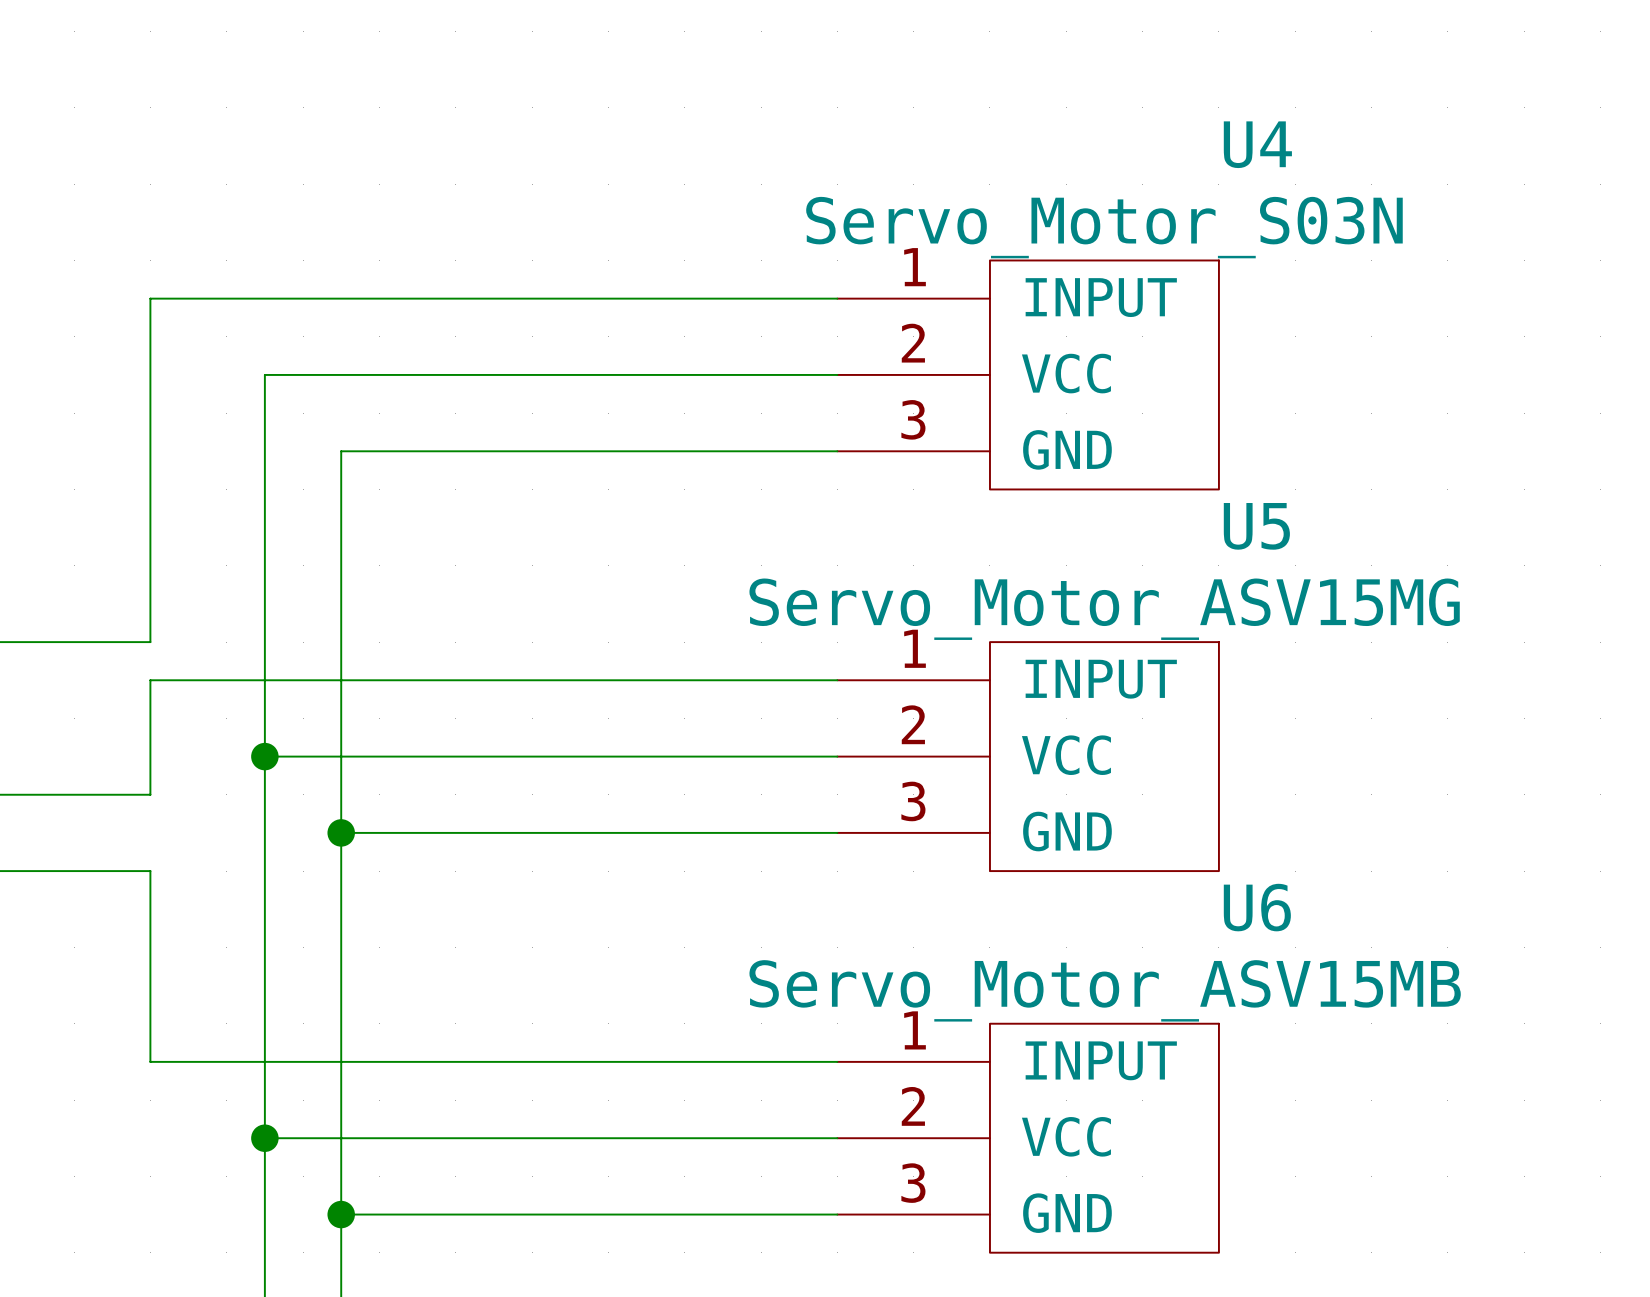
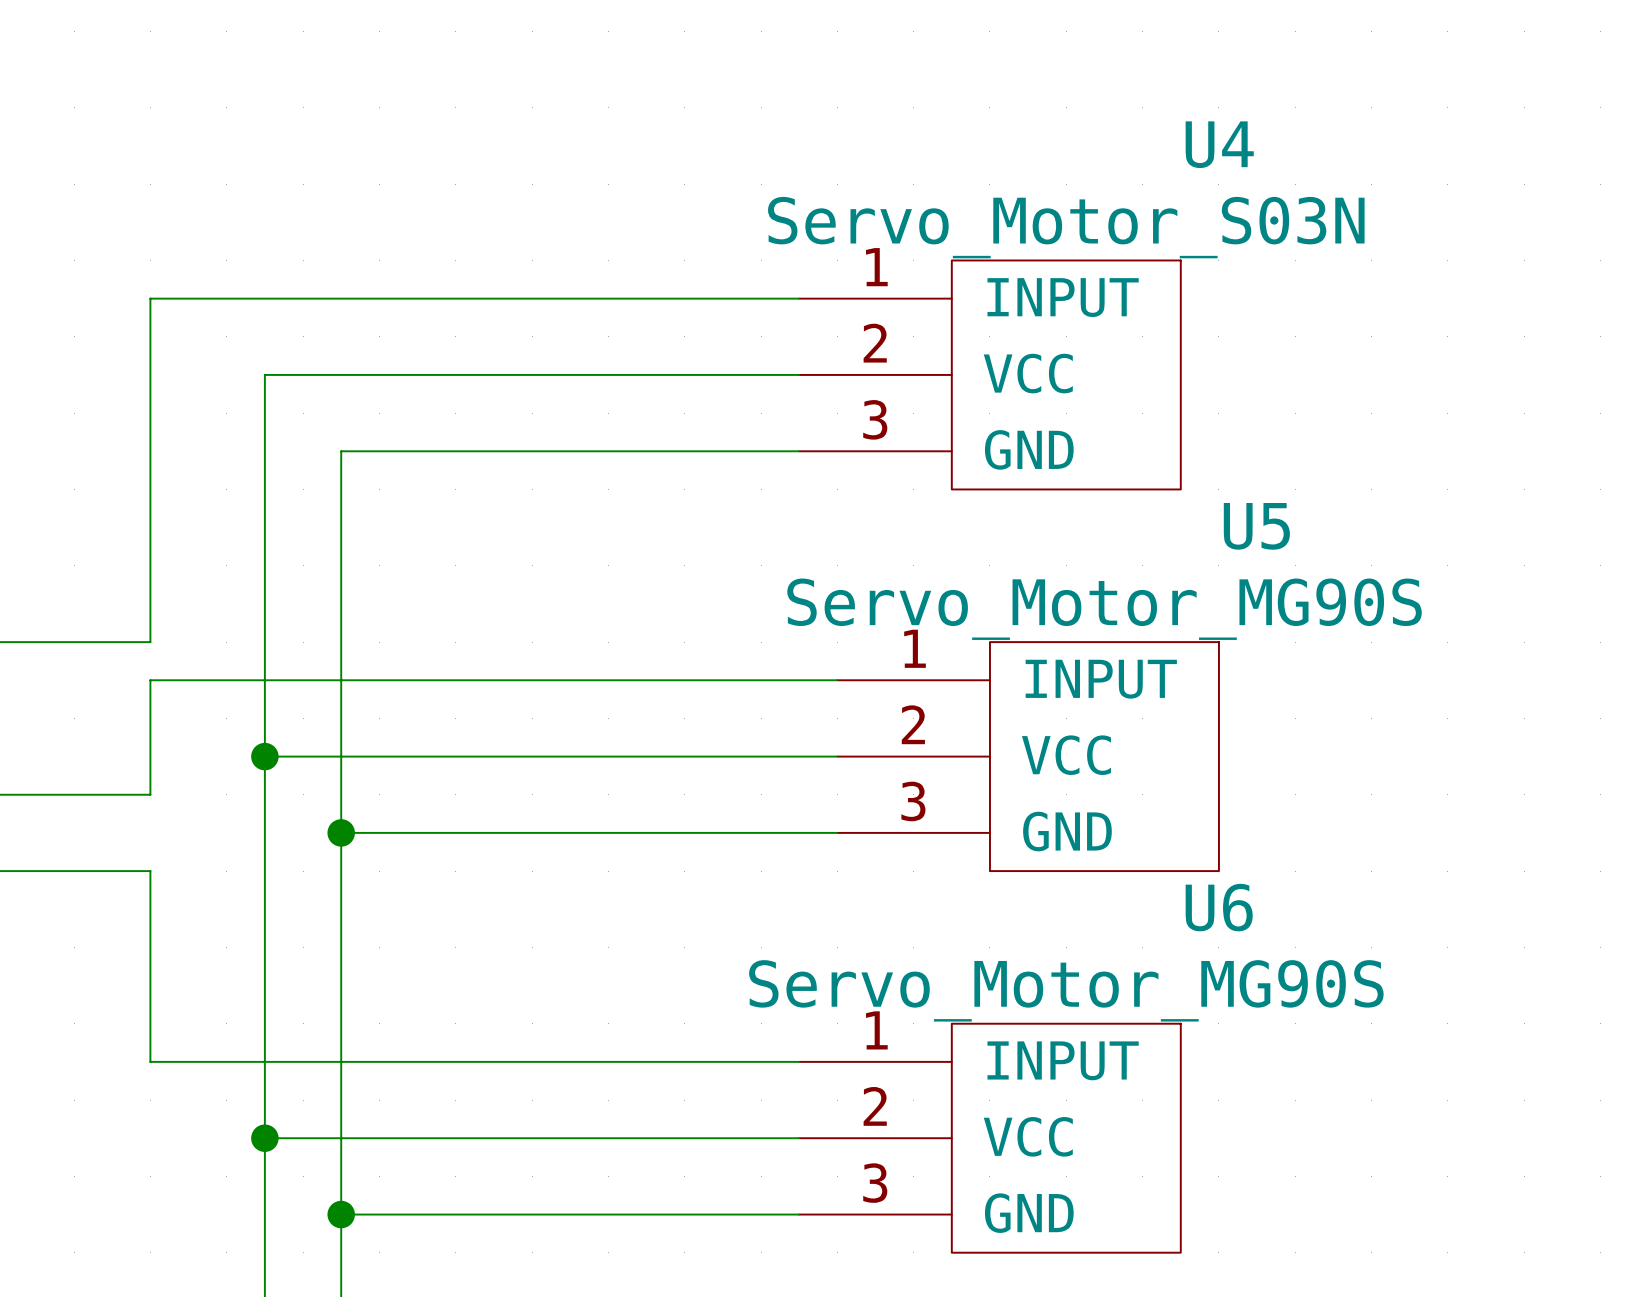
U4 position: (1028, 374) -> (989, 374)
U5 value: Servo_Motor_ASV15MG (1104, 609) -> Servo_Motor_MG90S (1104, 609)
U6 value: Servo_Motor_ASV15MB (1105, 990) -> Servo_Motor_MG90S (1066, 990)
U6 position: (1028, 1138) -> (989, 1138)

